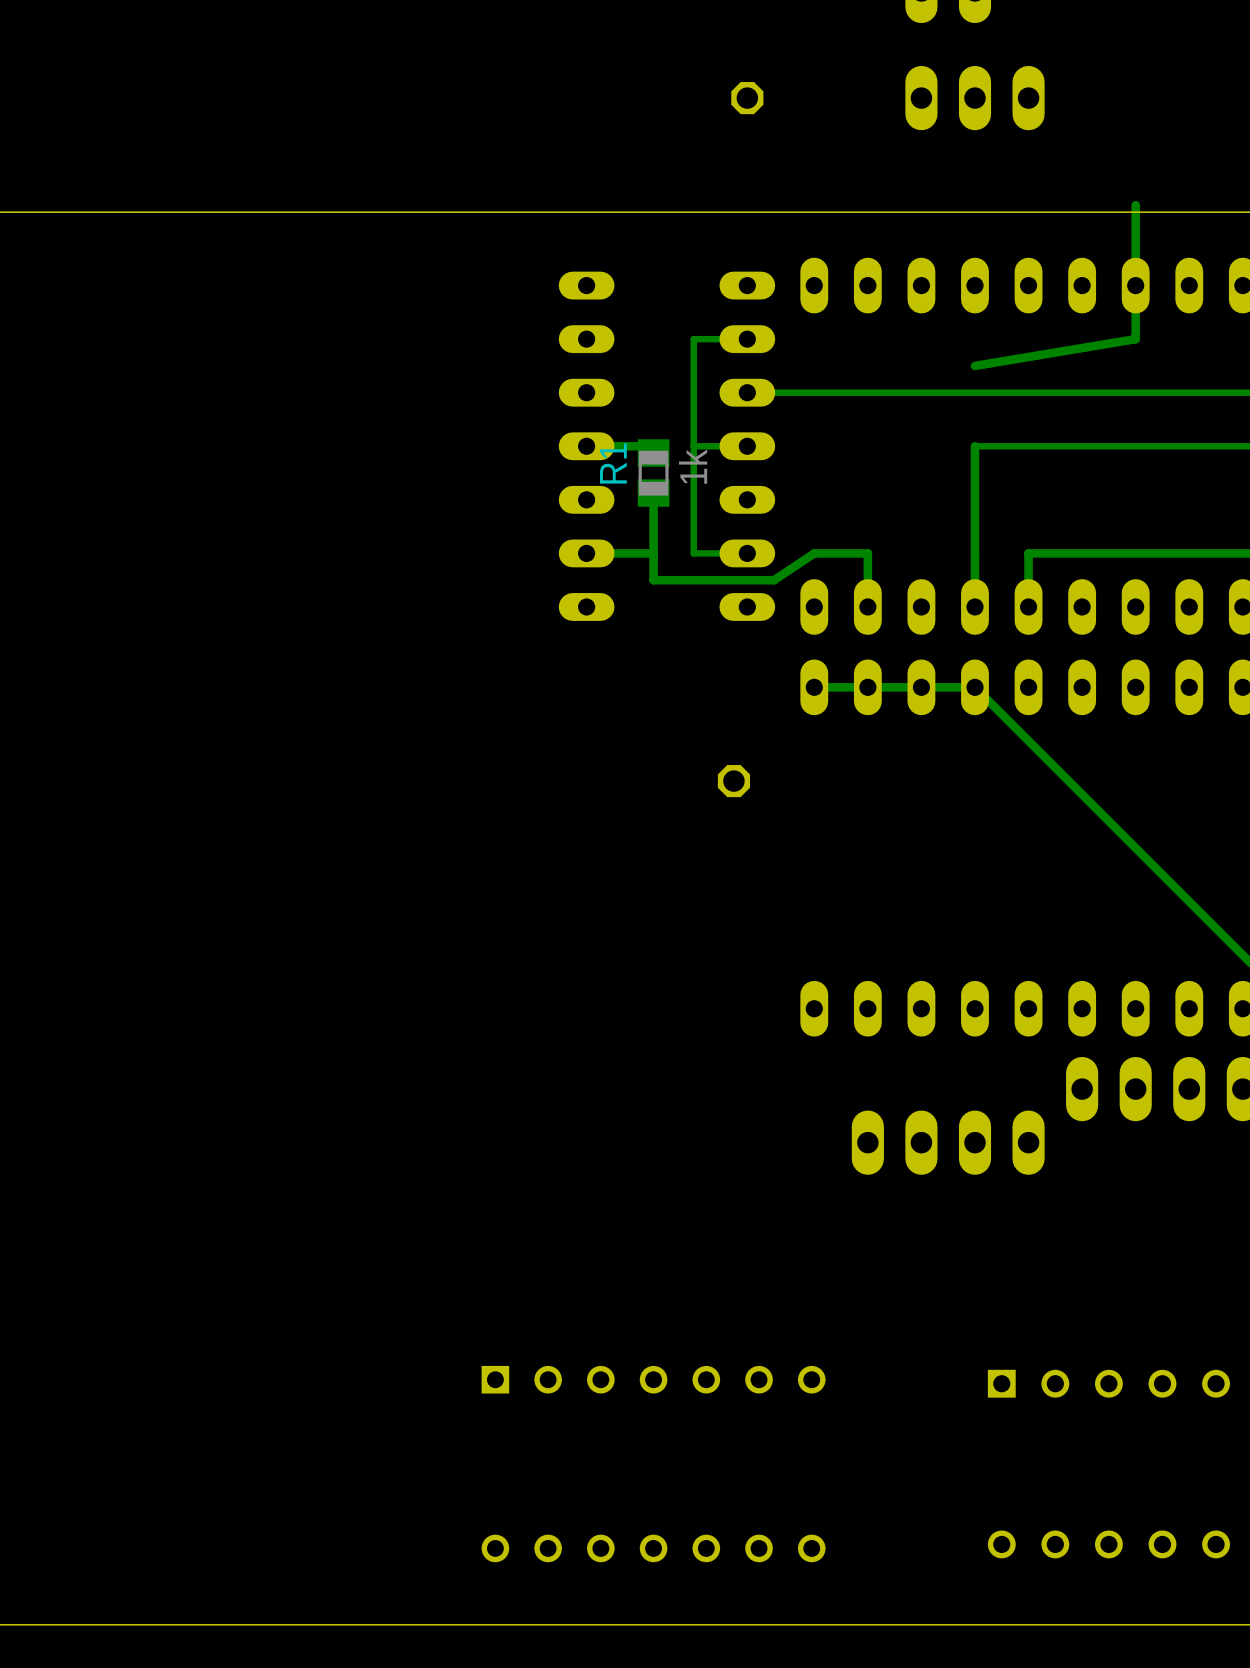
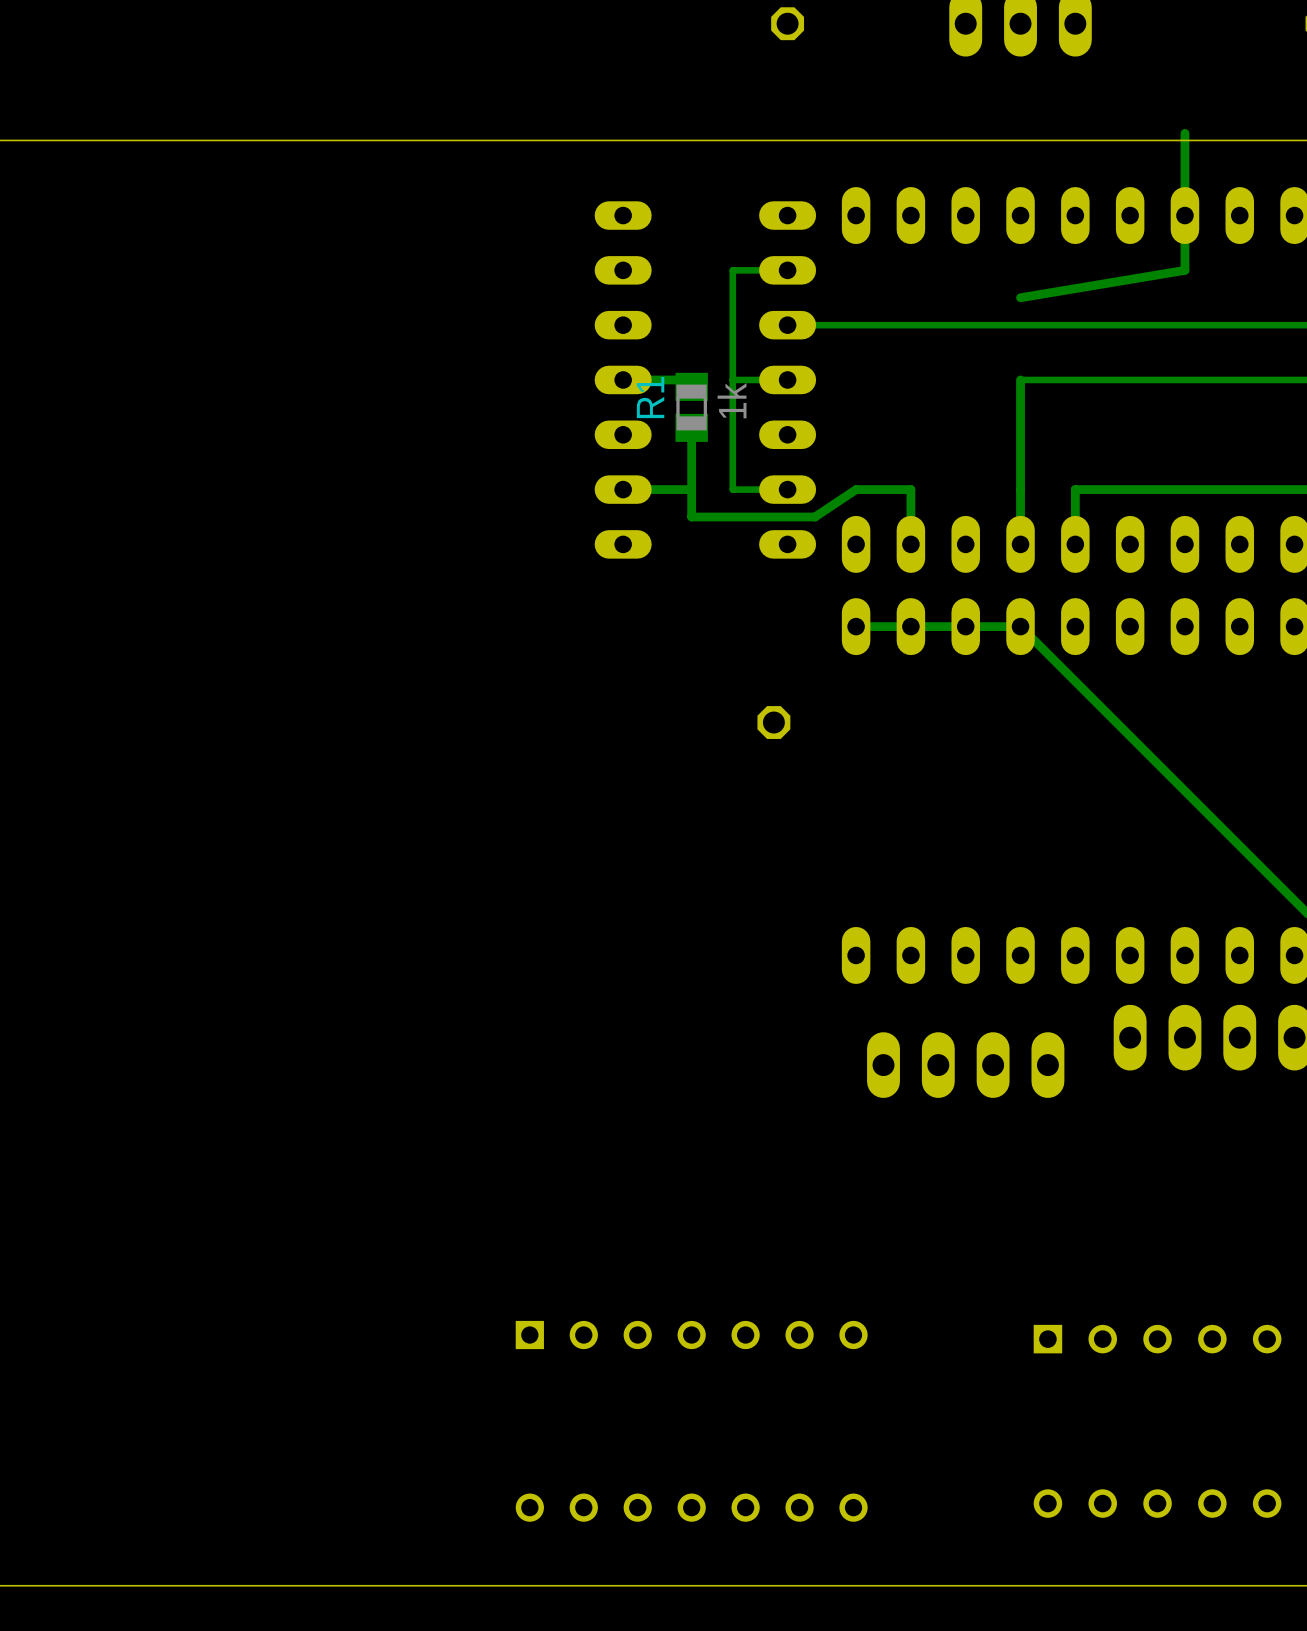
part position: (948, 1142) -> (965, 1065)

